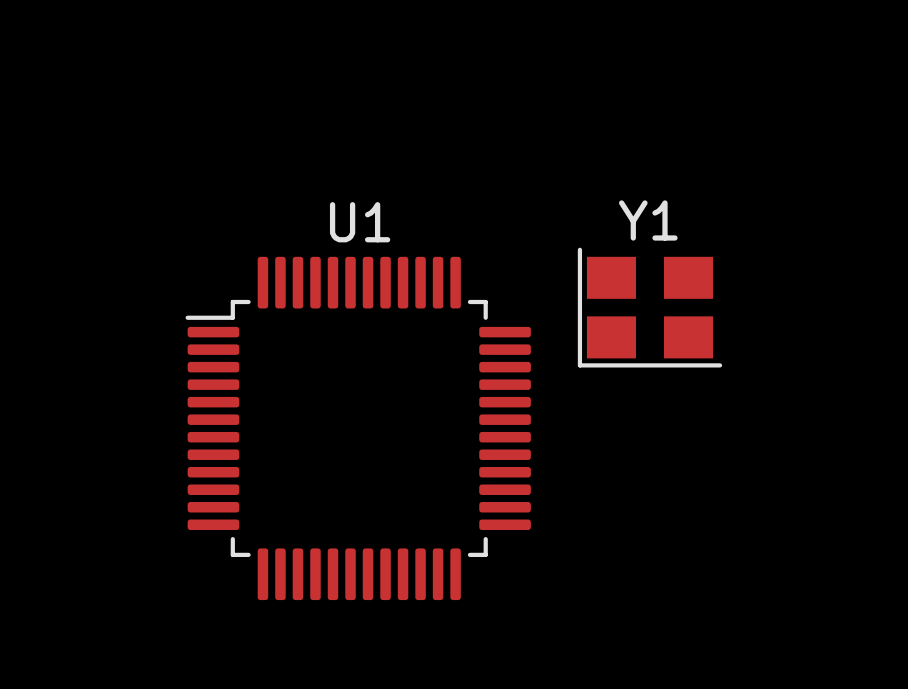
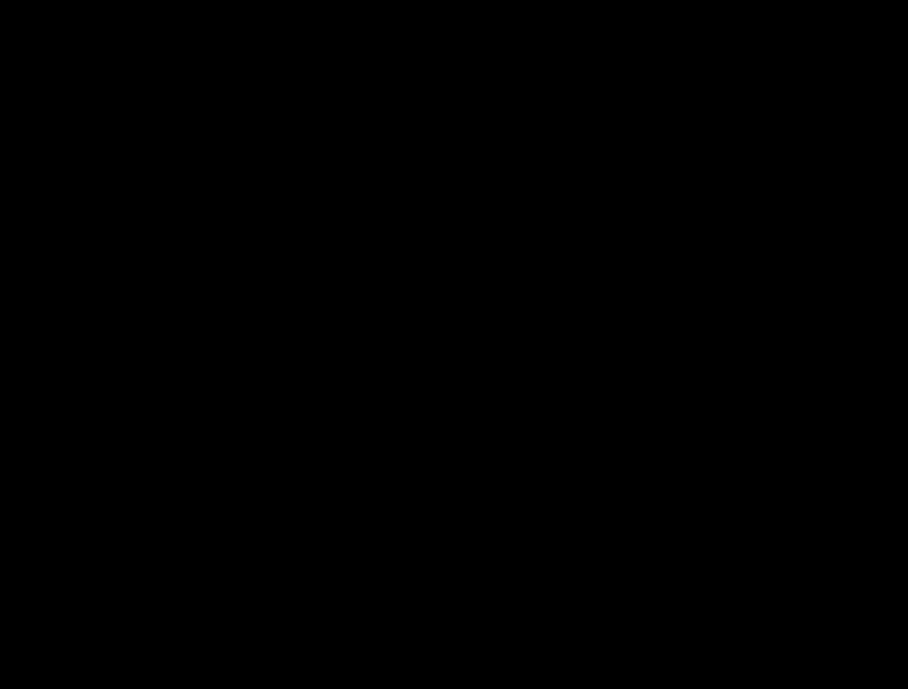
Y1: (649, 307) -> none
U1: (358, 428) -> none

